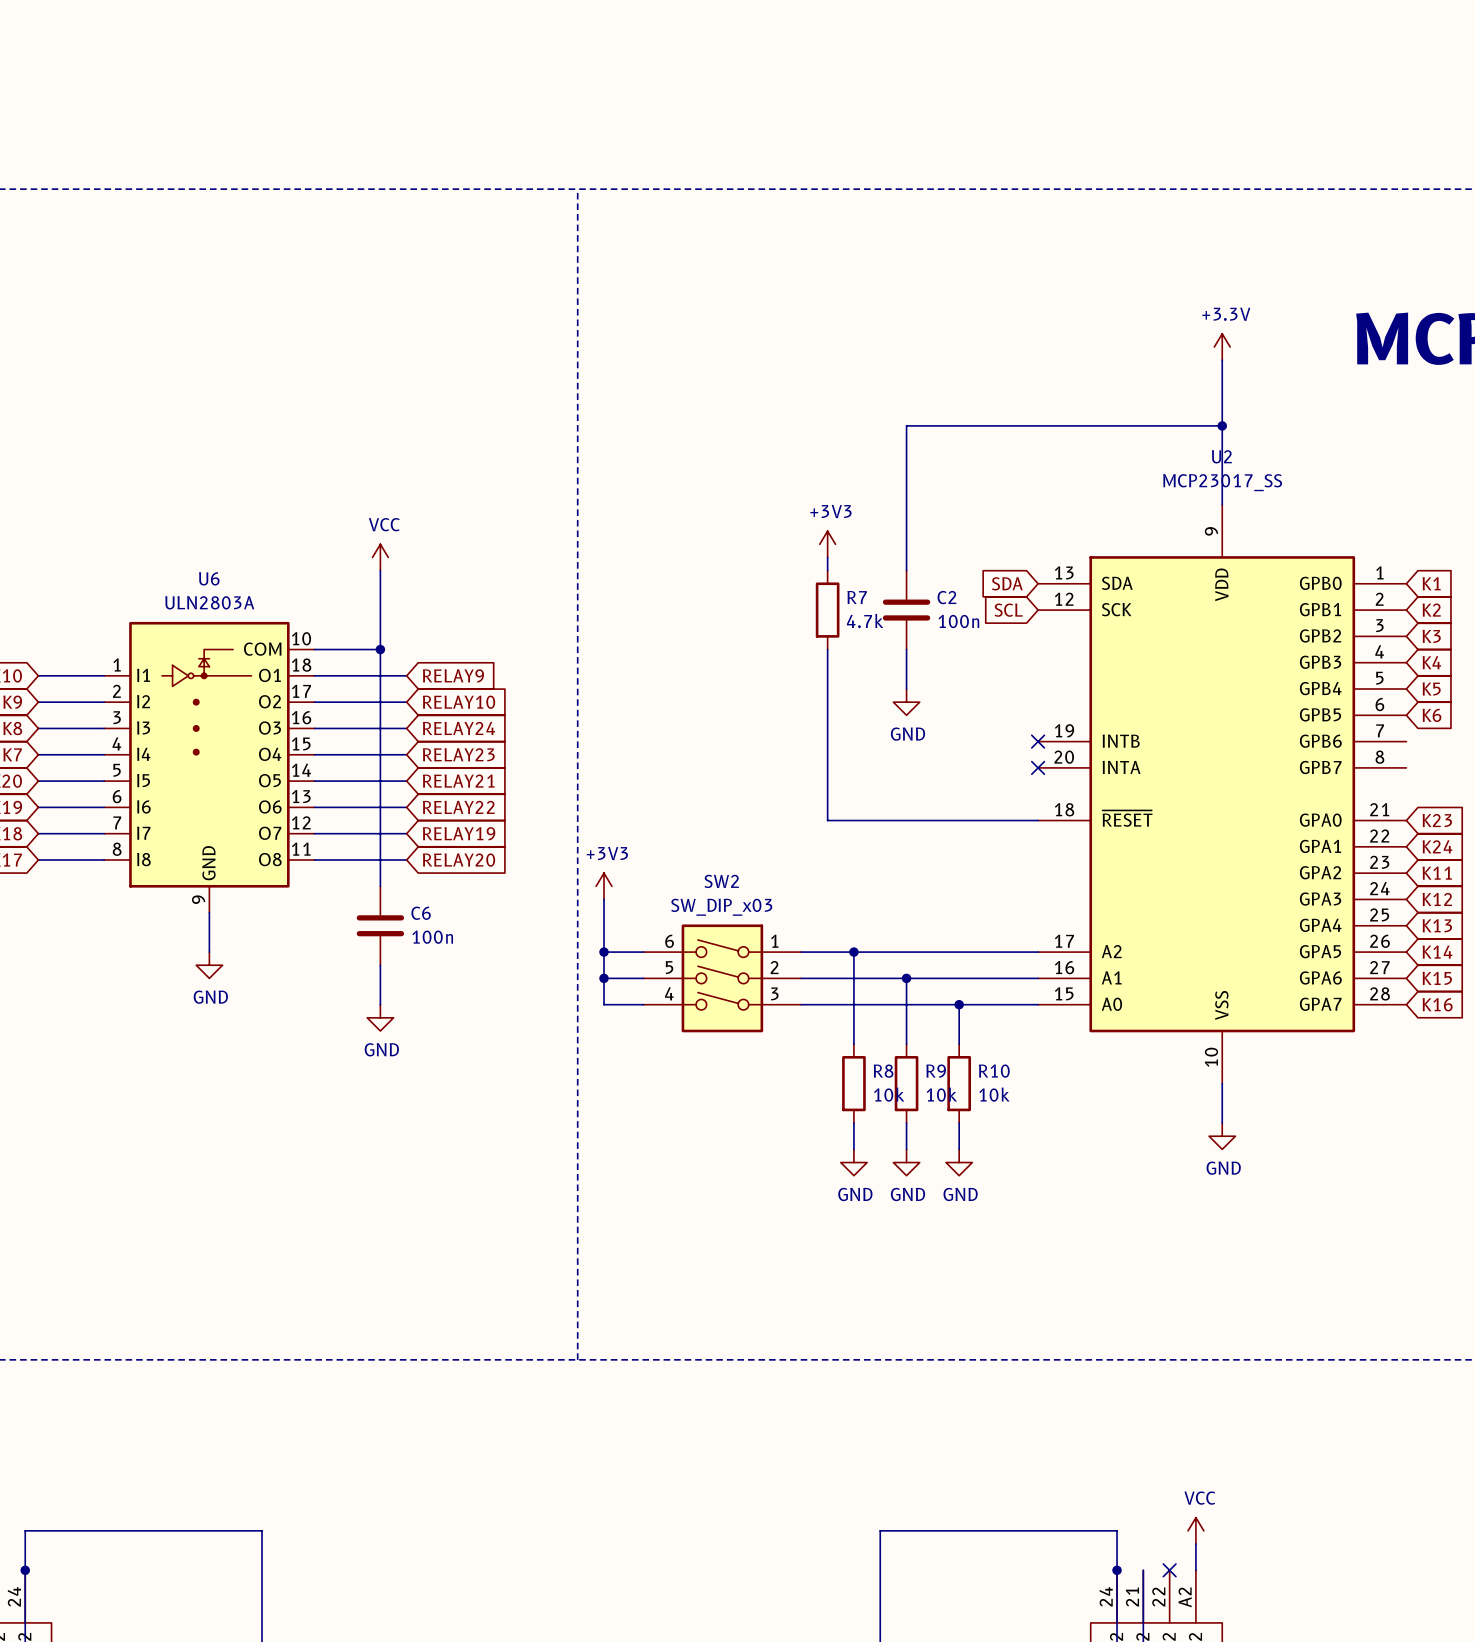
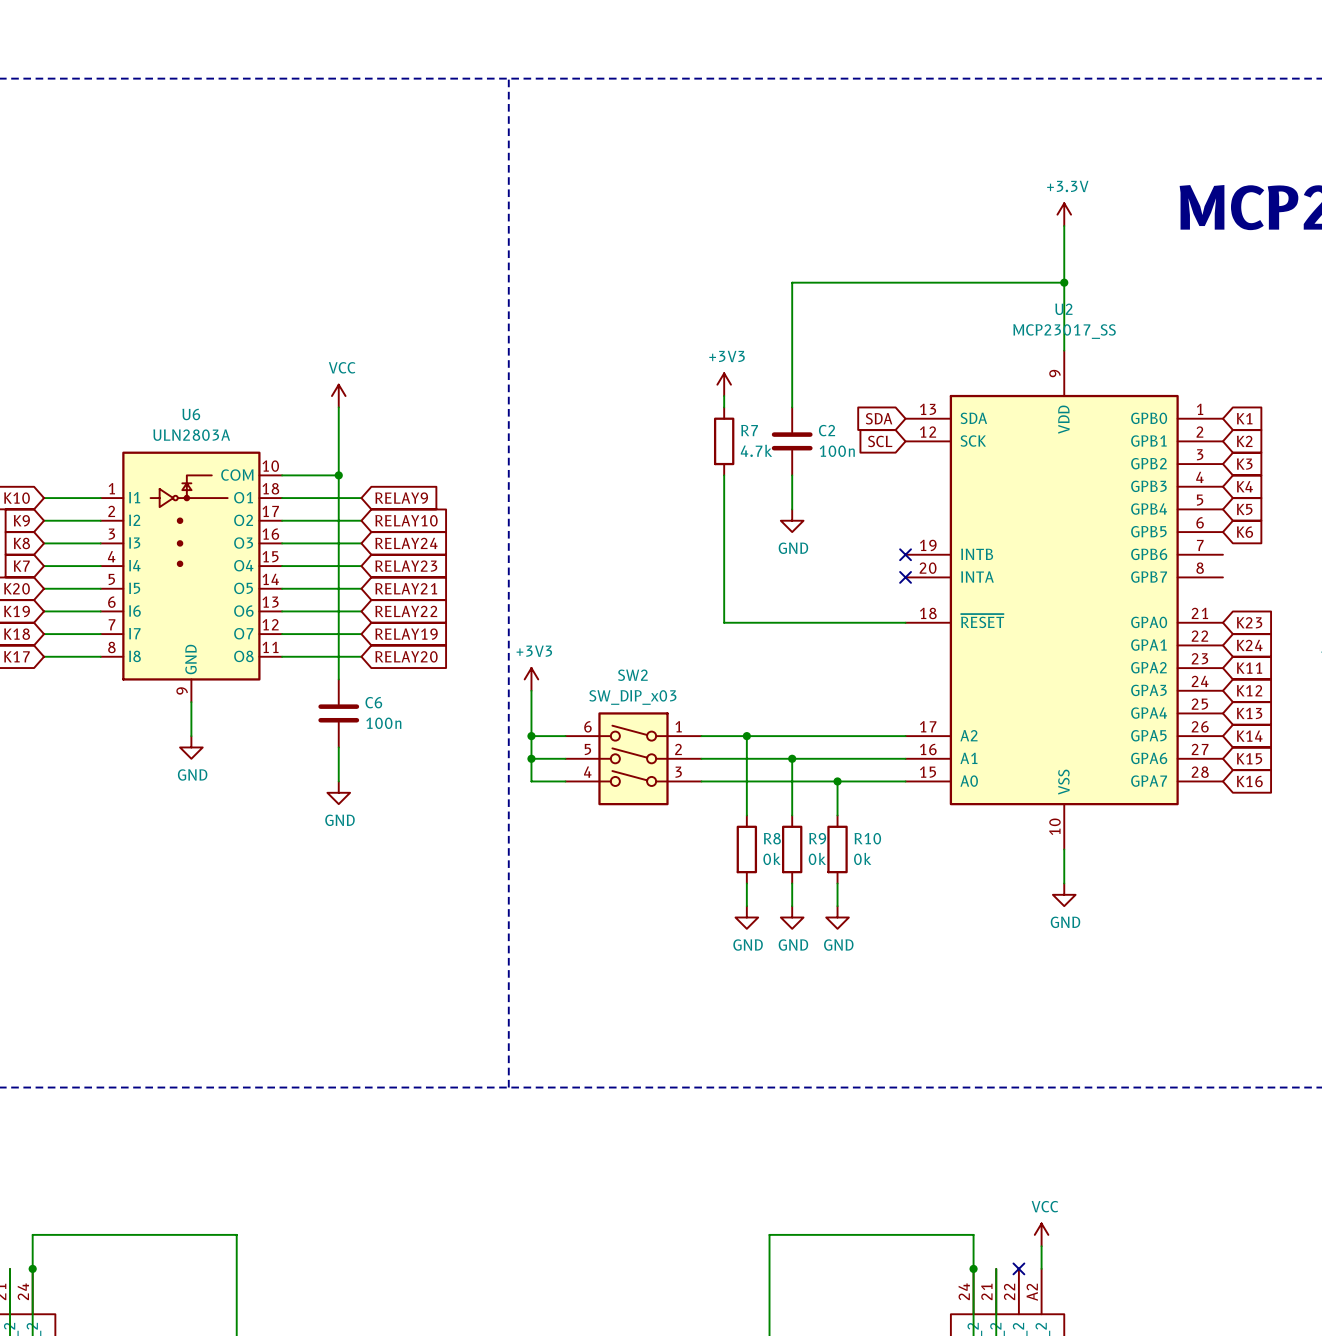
R8 value: 10k (889, 1094) -> 0k (772, 858)
R9 value: 10k (941, 1094) -> 0k (817, 858)
R10 value: 10k (994, 1094) -> 0k (862, 858)

